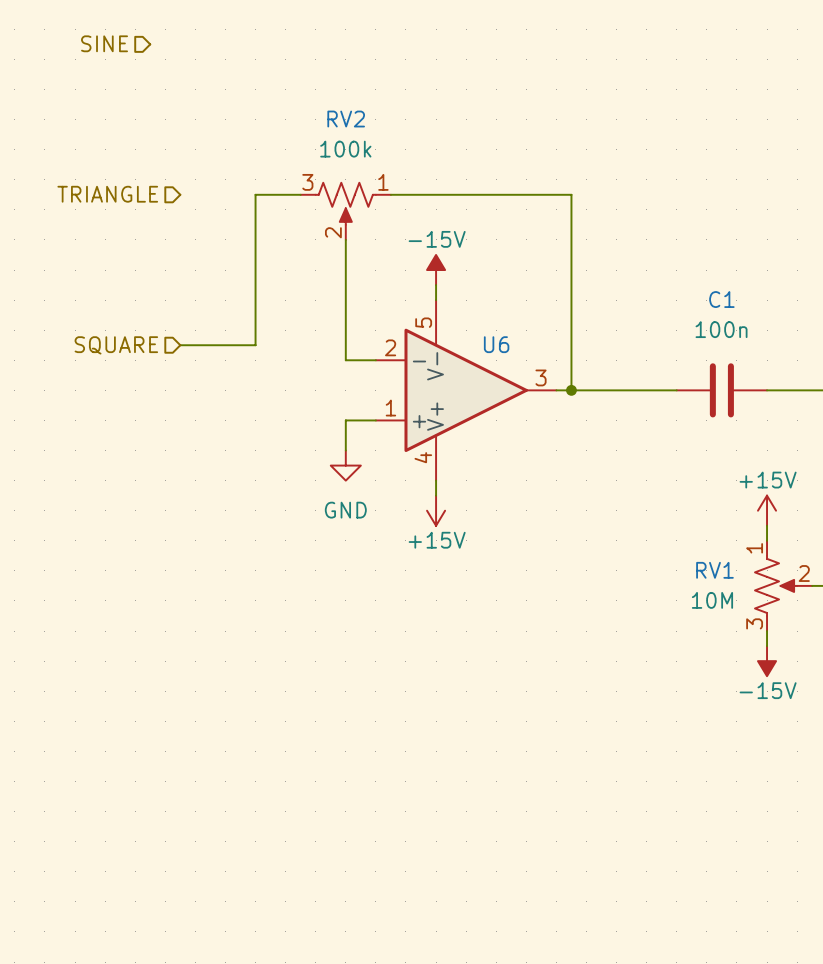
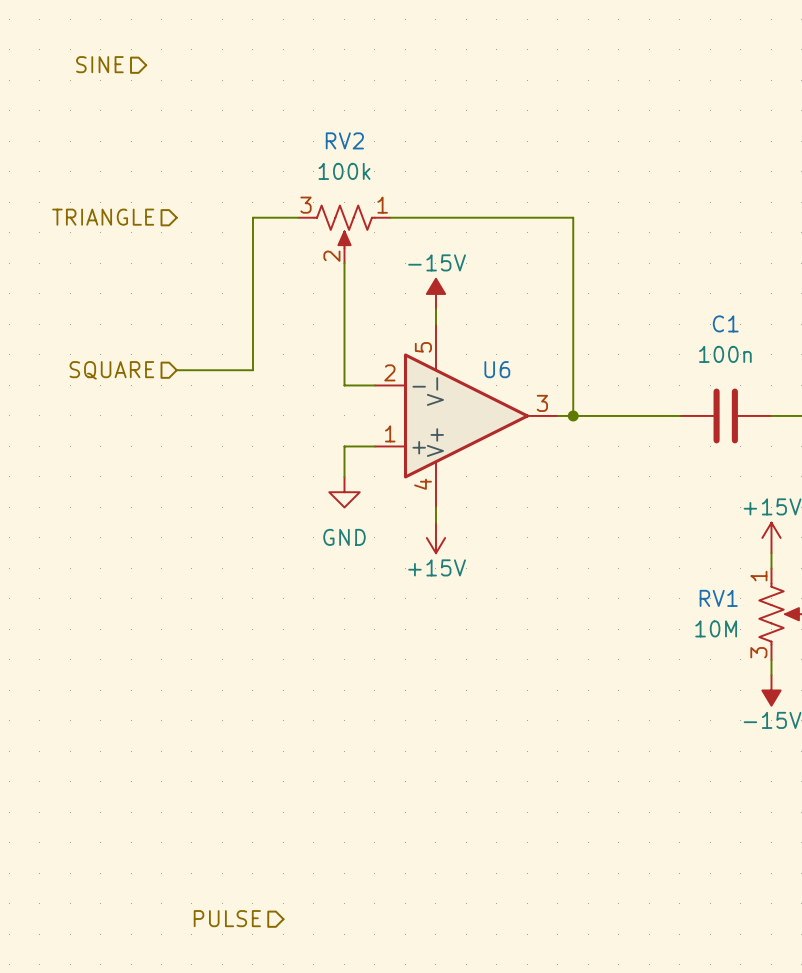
hierarchical label: none -> PULSE (227, 918)

